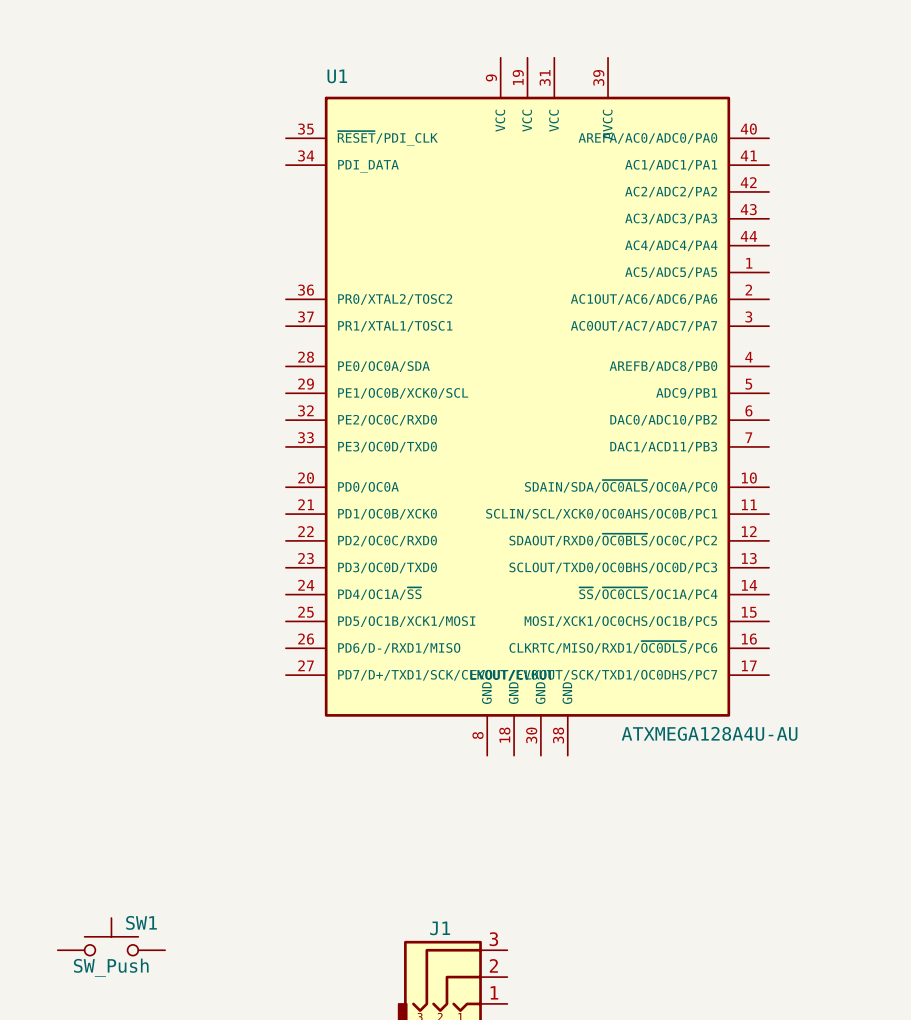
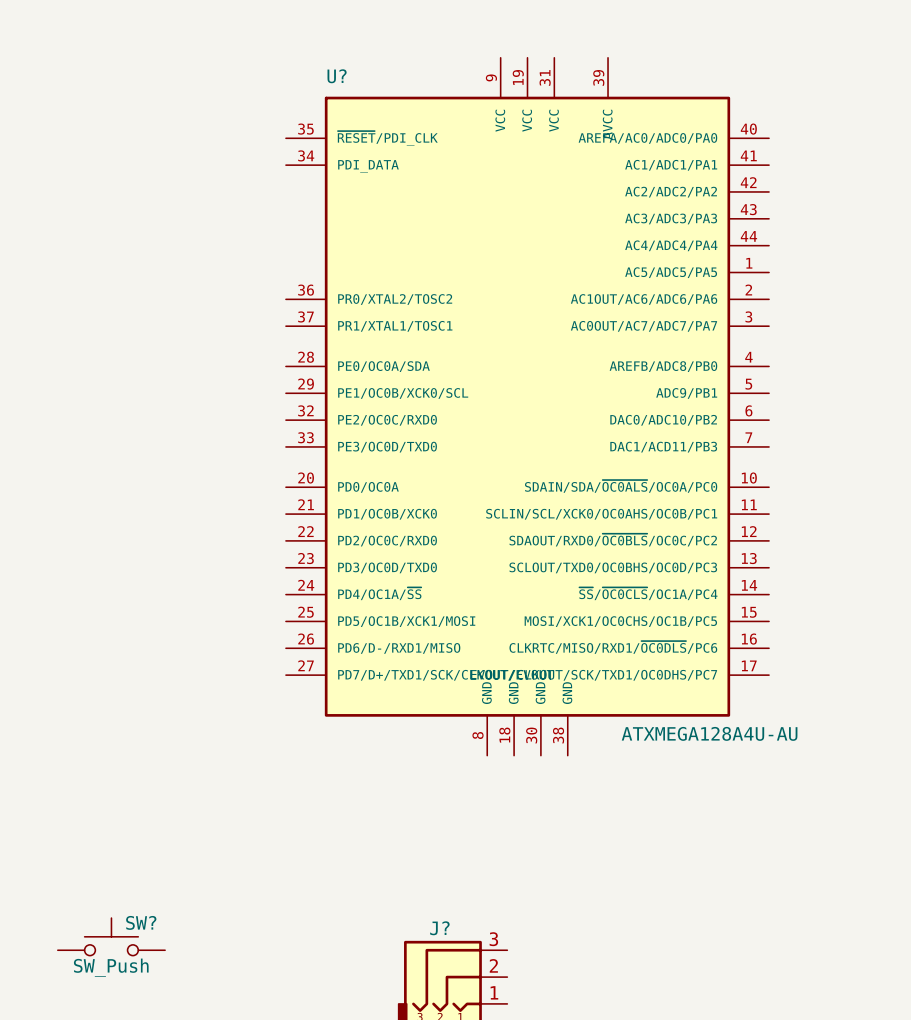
U1 name: U1 (337, 76) -> U? (337, 76)
SW1 name: SW1 (141, 922) -> SW? (141, 922)
J1 name: J1 (440, 928) -> J? (439, 928)

